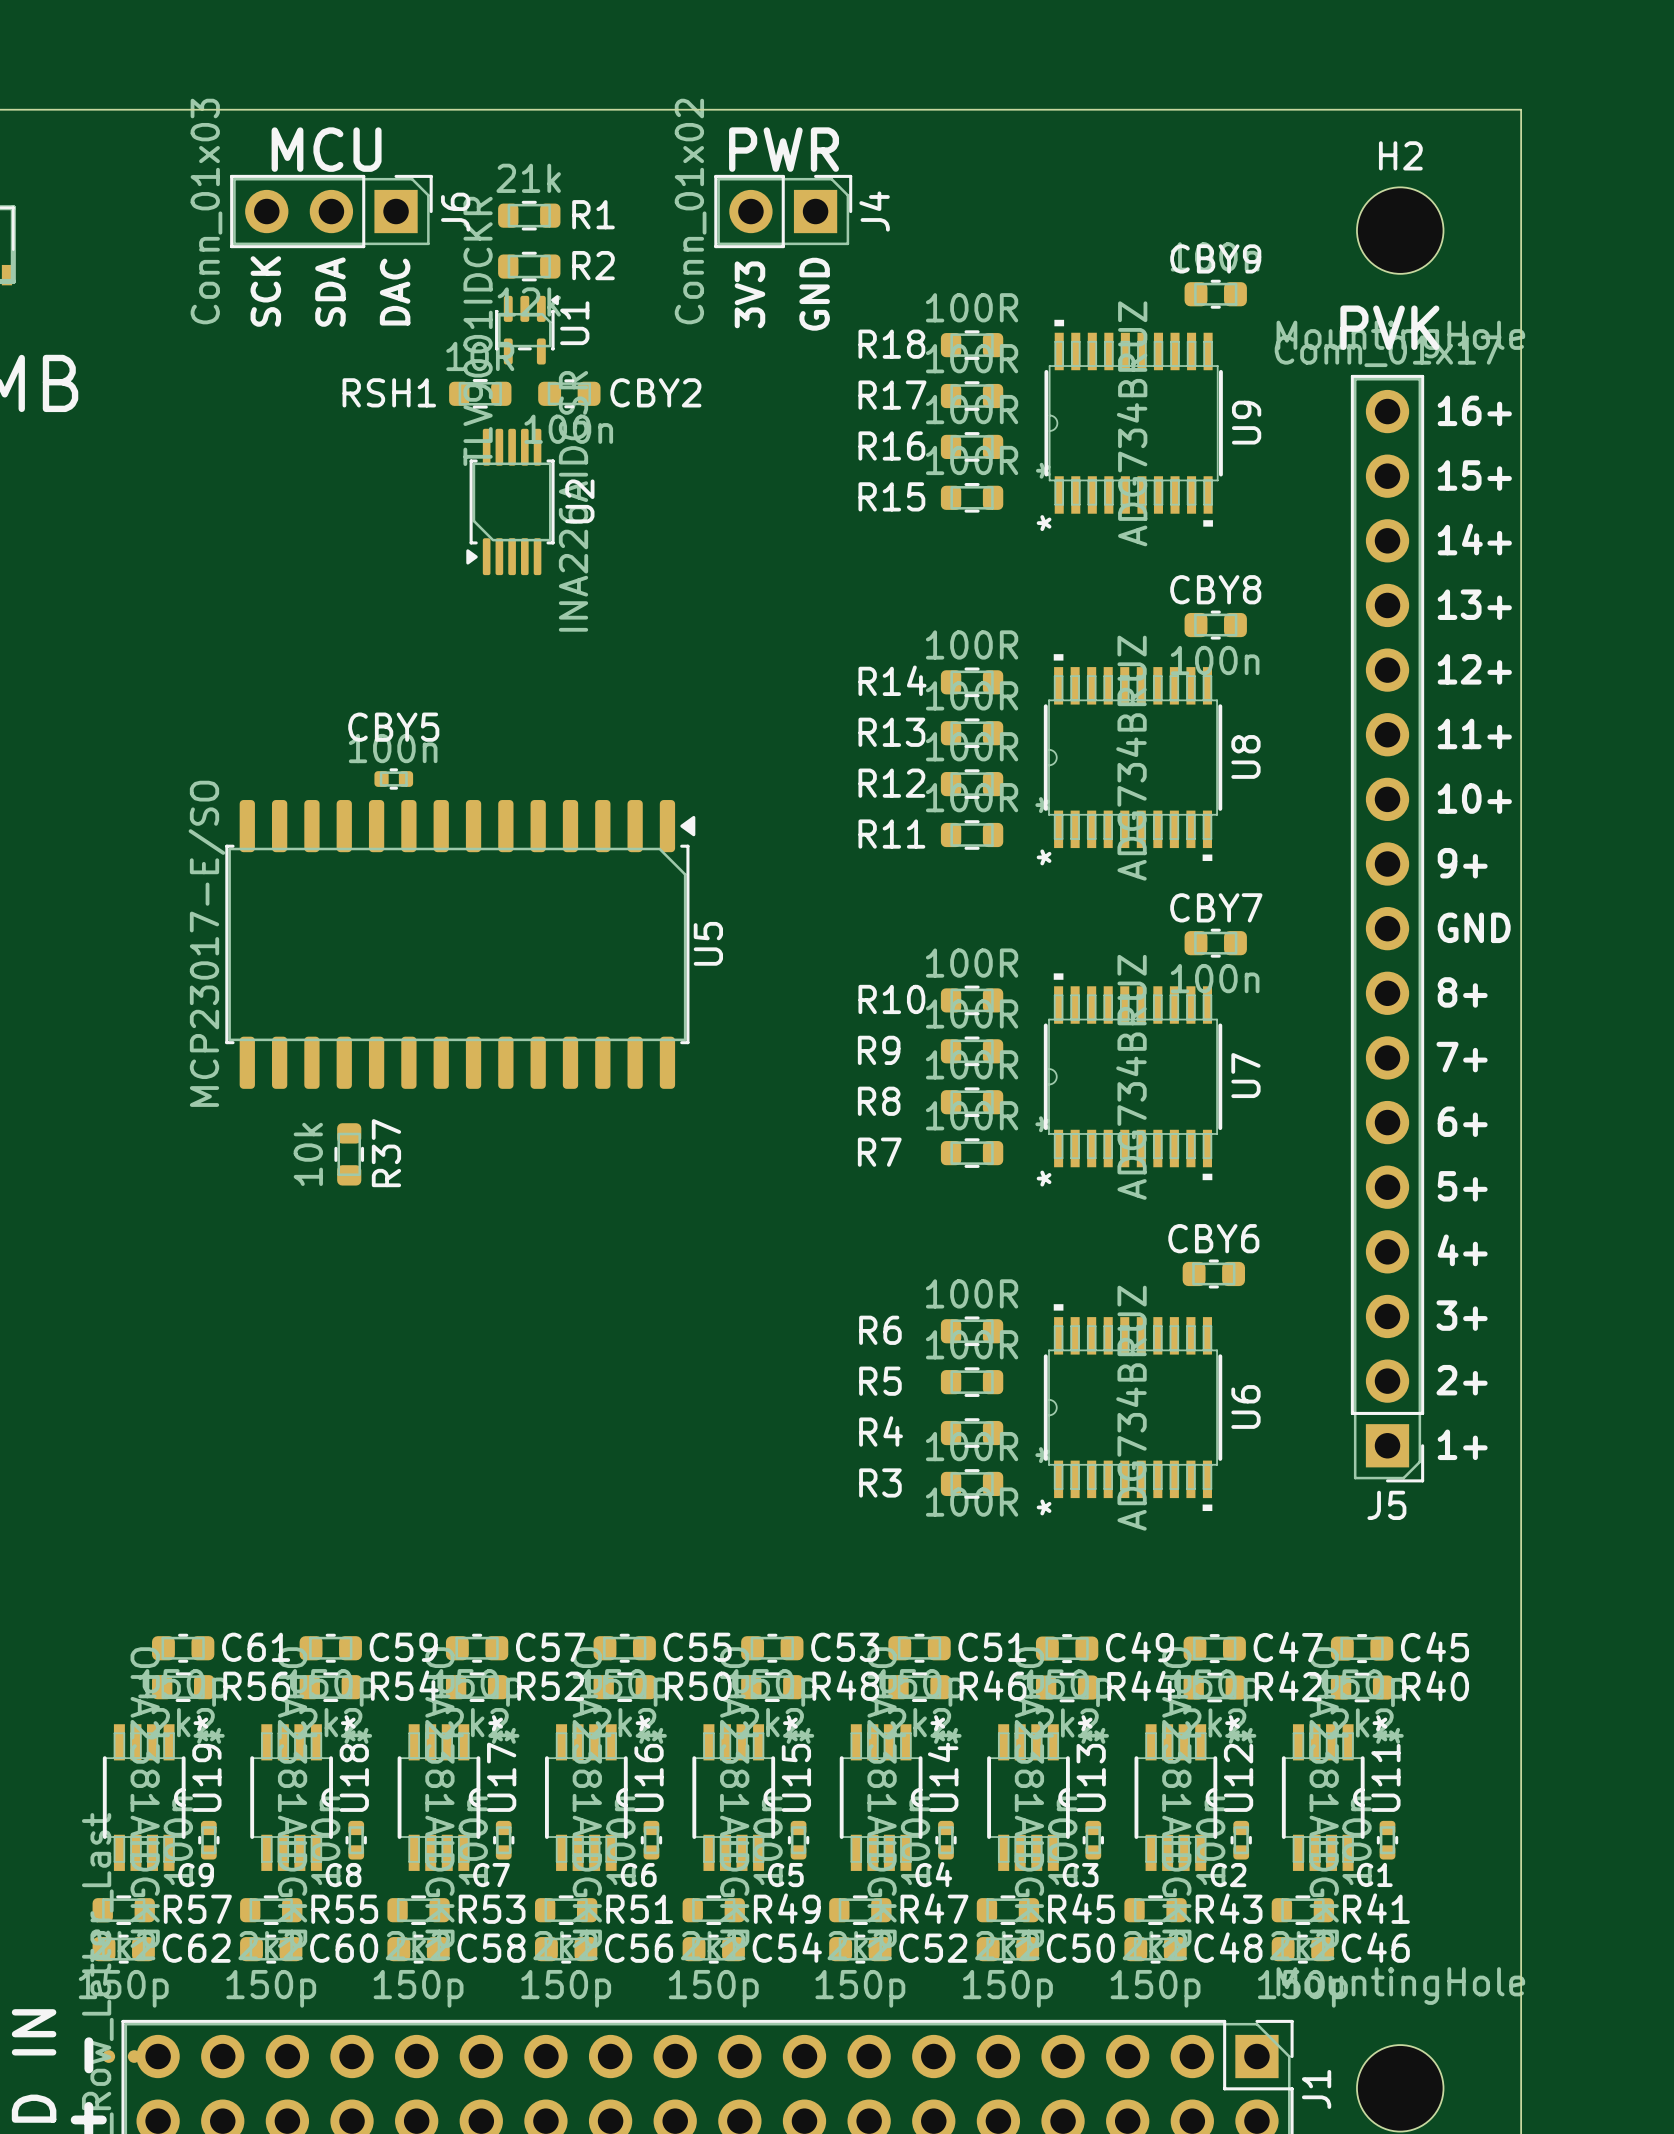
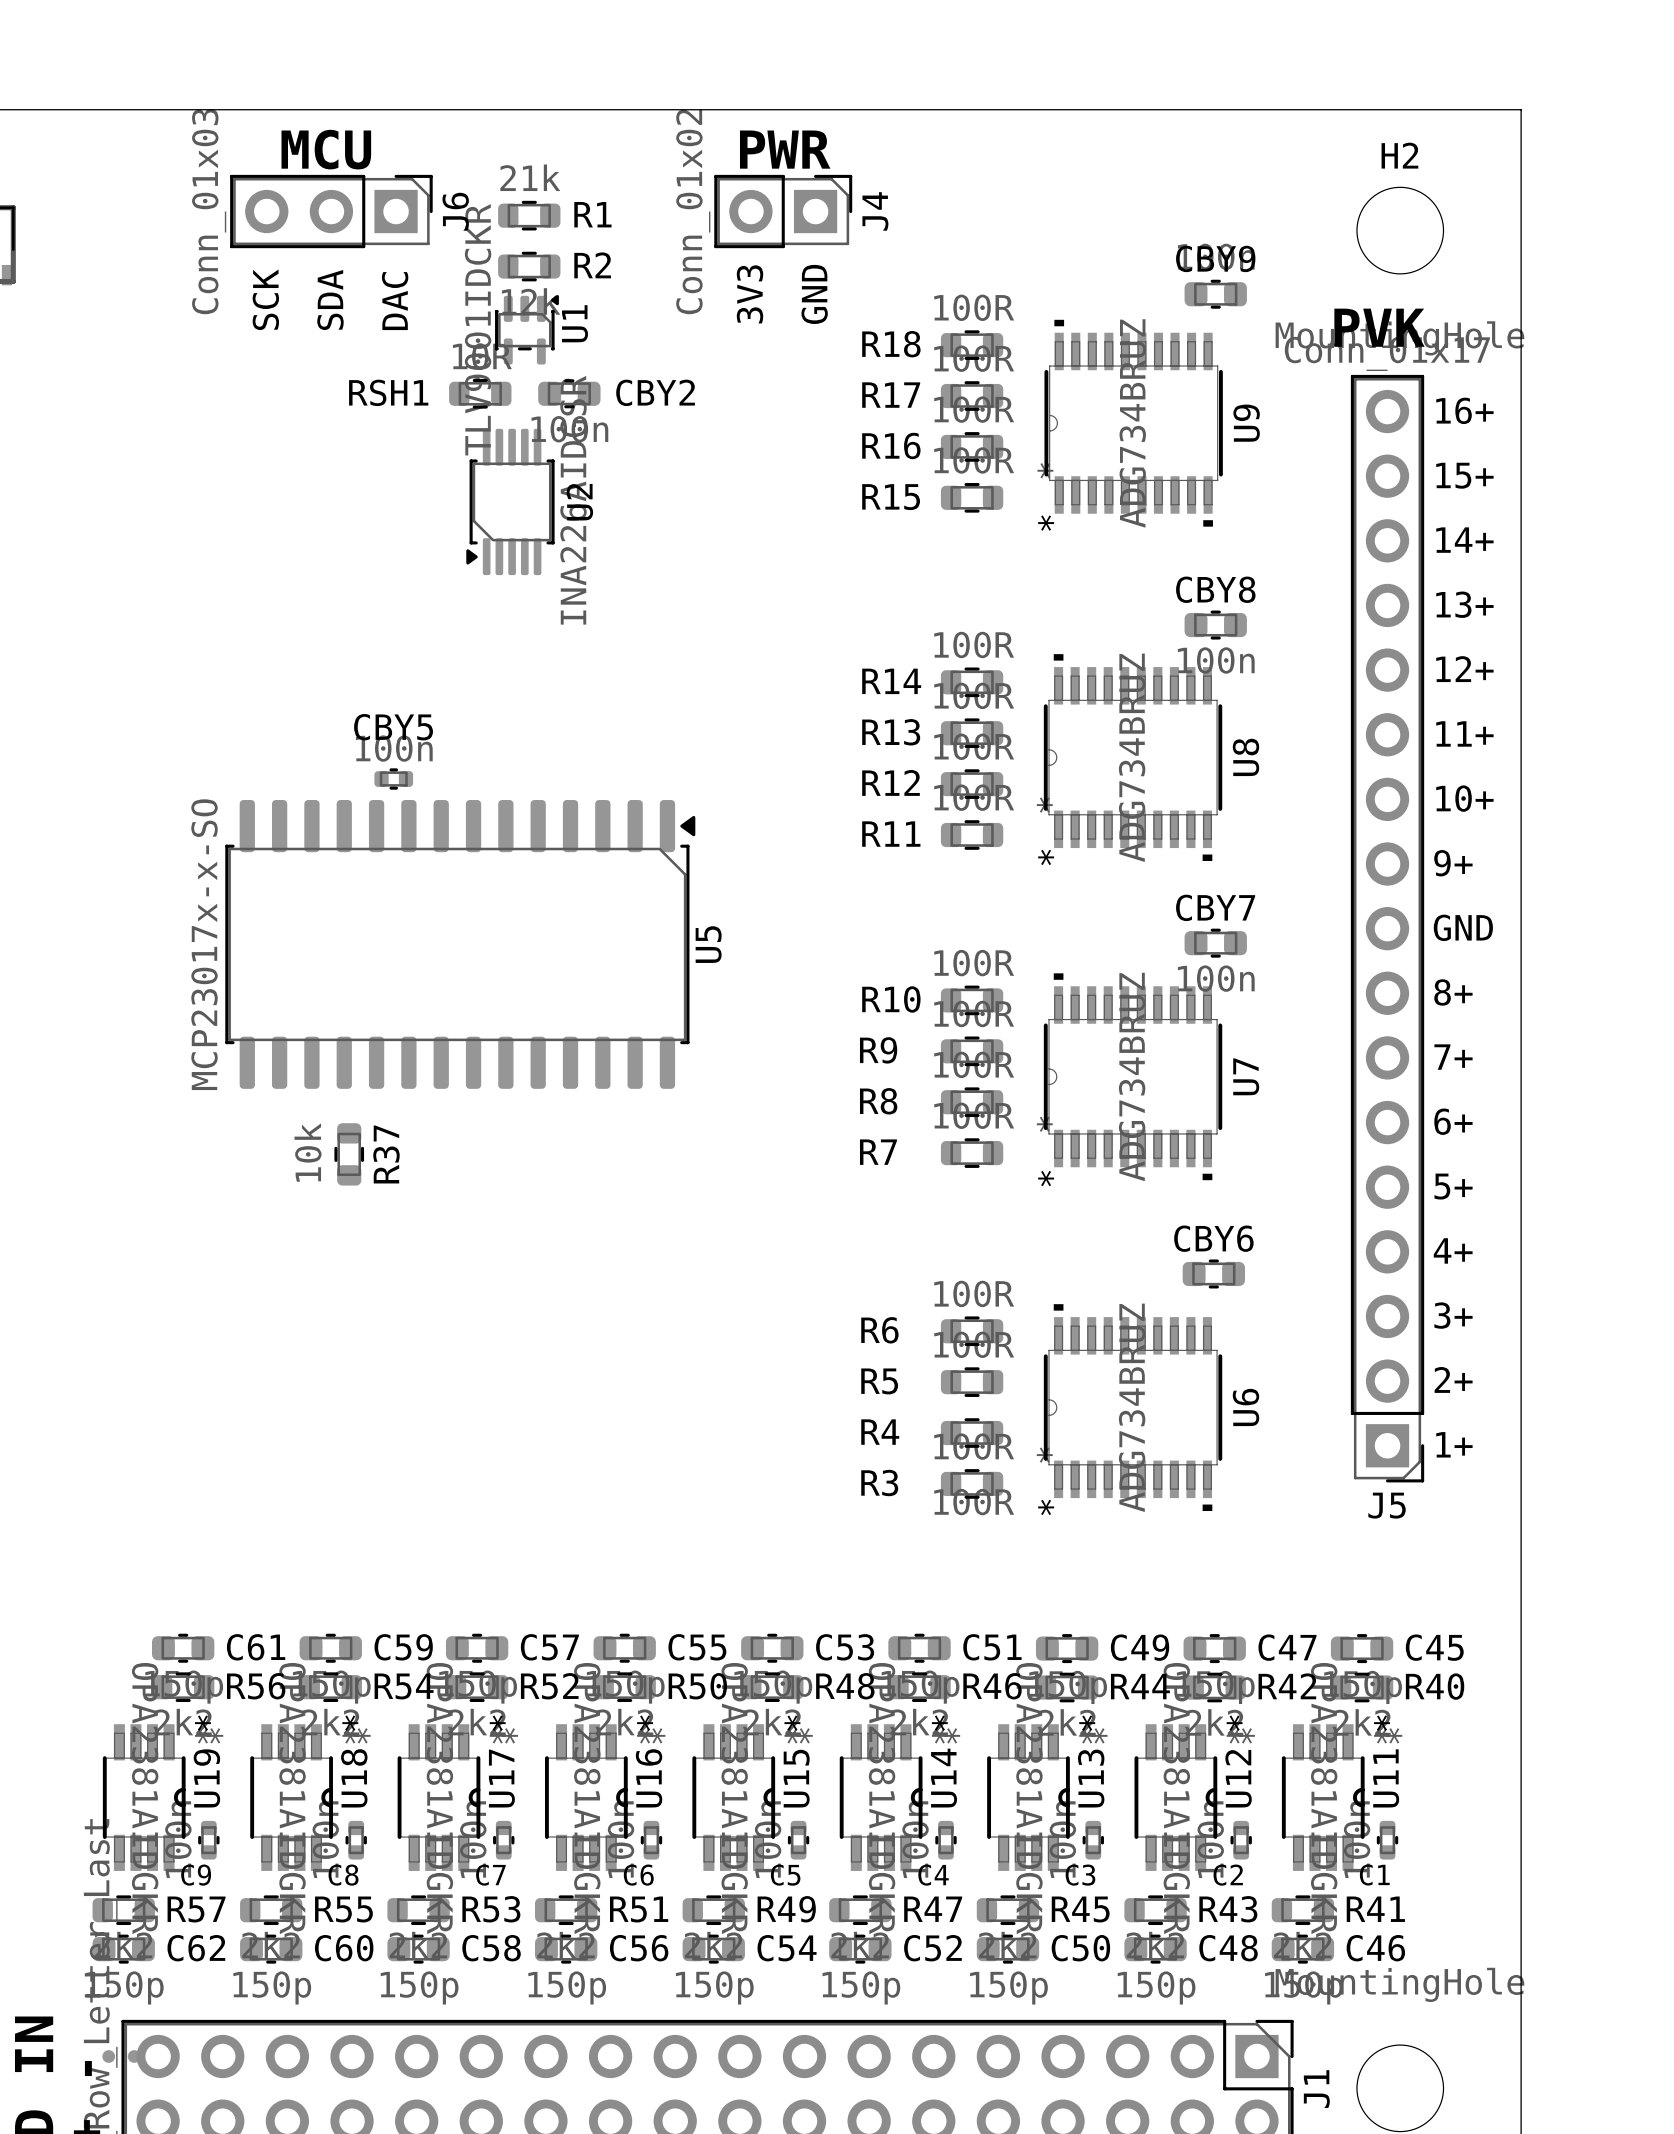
U5 value: MCP23017-E/SO (206, 943) -> MCP23017x-x-SO (204, 944)

